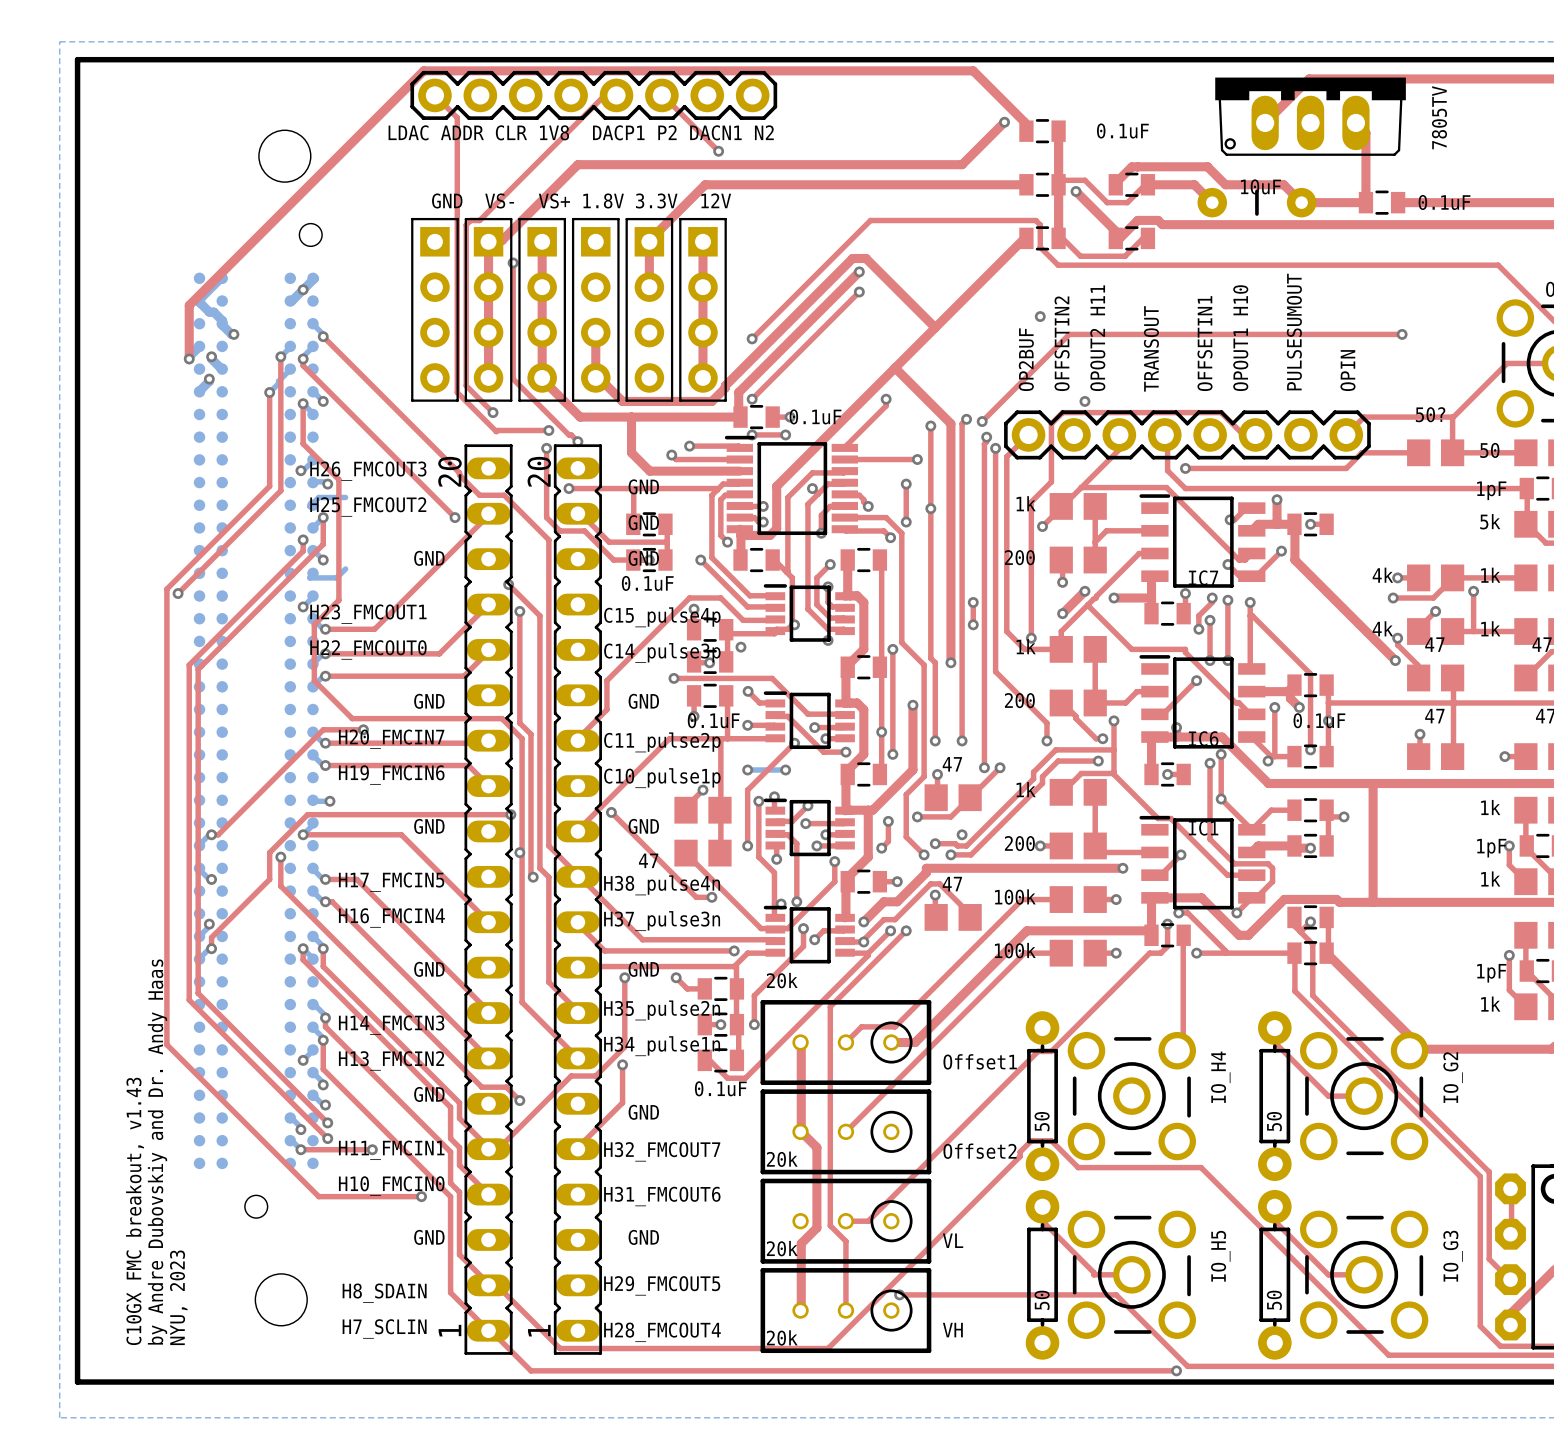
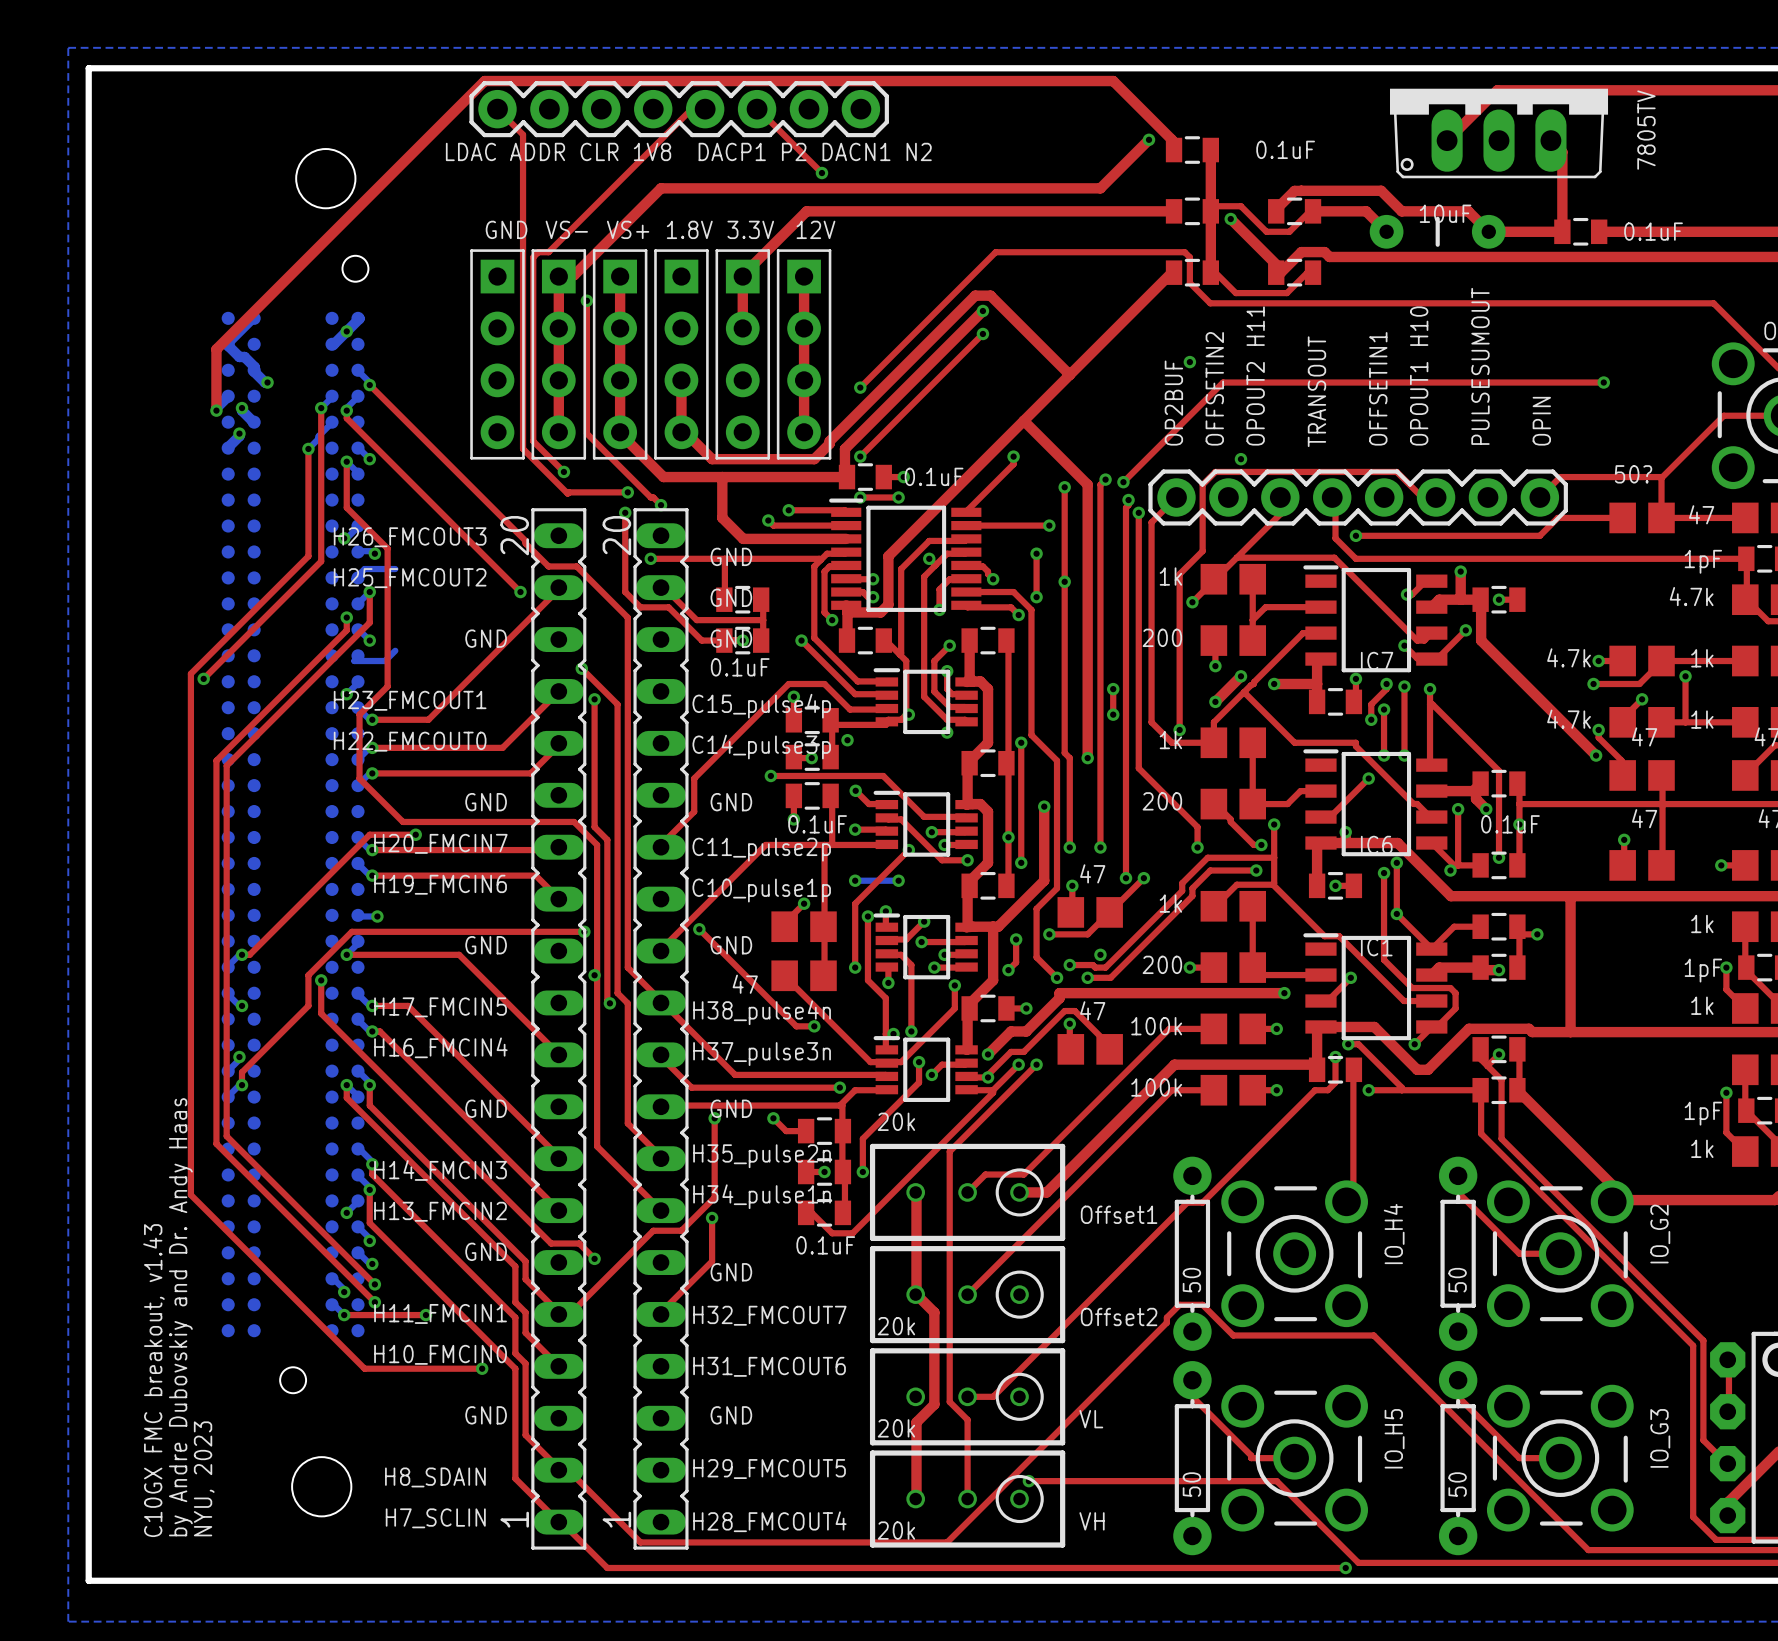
part value: 50 (1489, 450) -> 47 (1701, 514)
part value: 5k (1490, 521) -> 4.7k (1691, 596)
part value: 4k (1382, 575) -> 4.7k (1569, 657)
part value: 4k (1382, 628) -> 4.7k (1569, 719)

